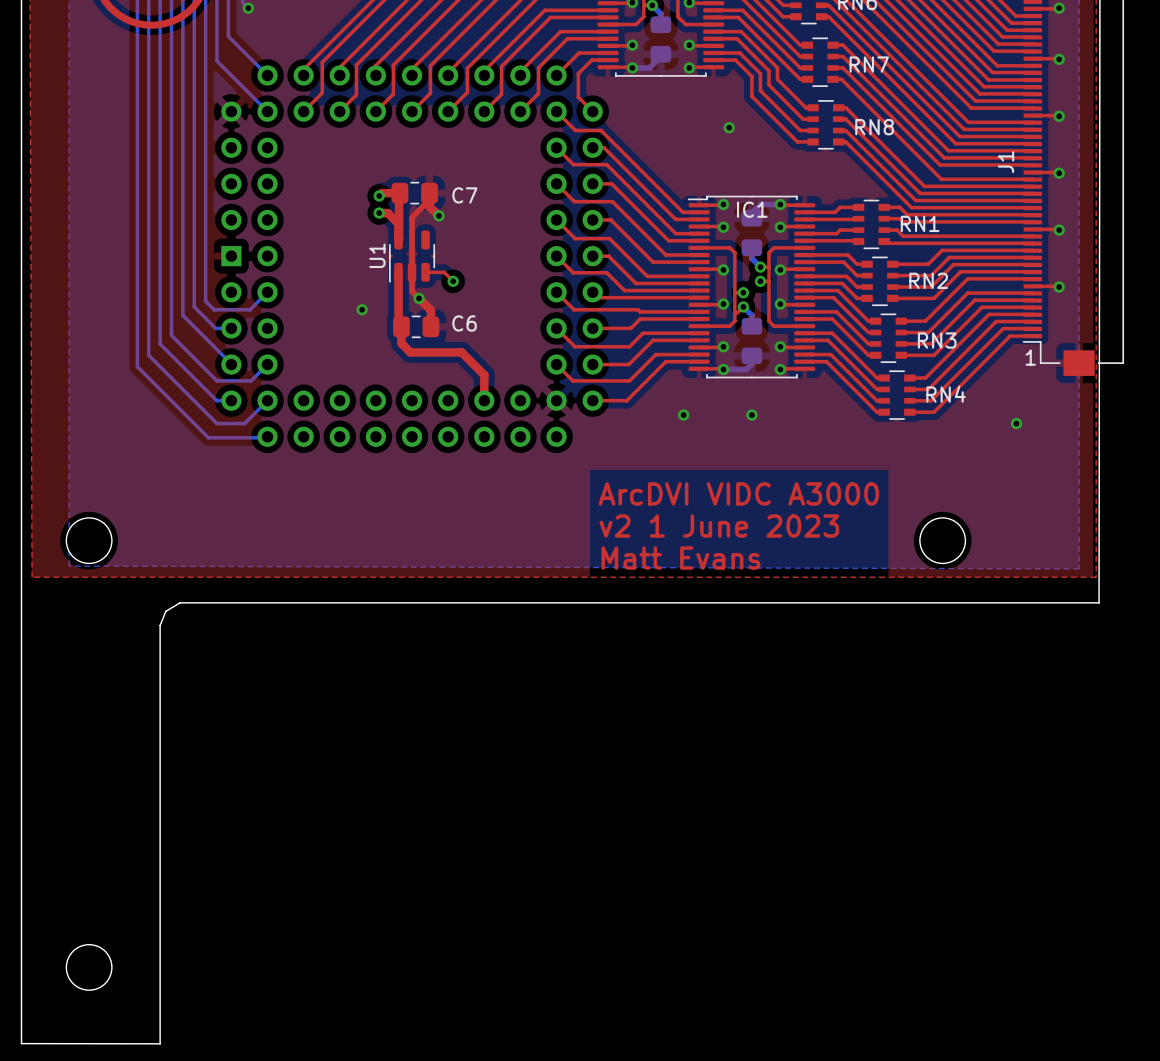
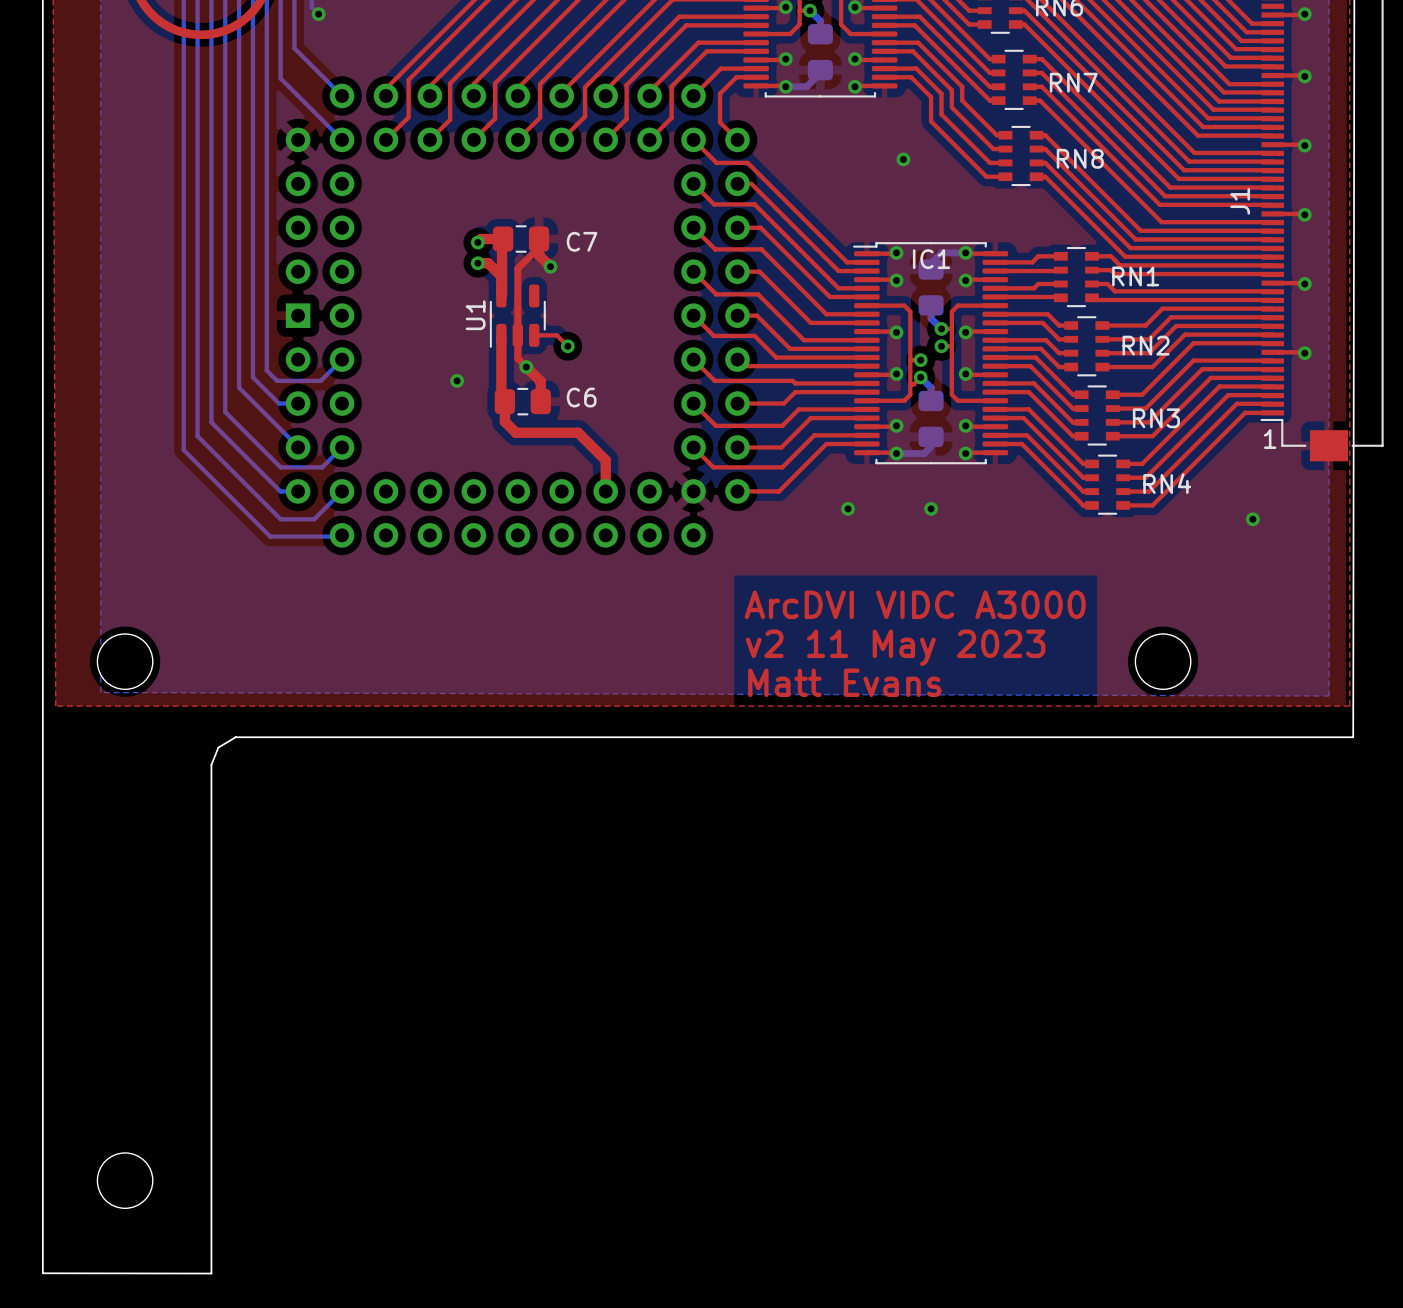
text: v2 1 June 2023 (719, 525) -> v2 11 May 2023 (895, 647)

